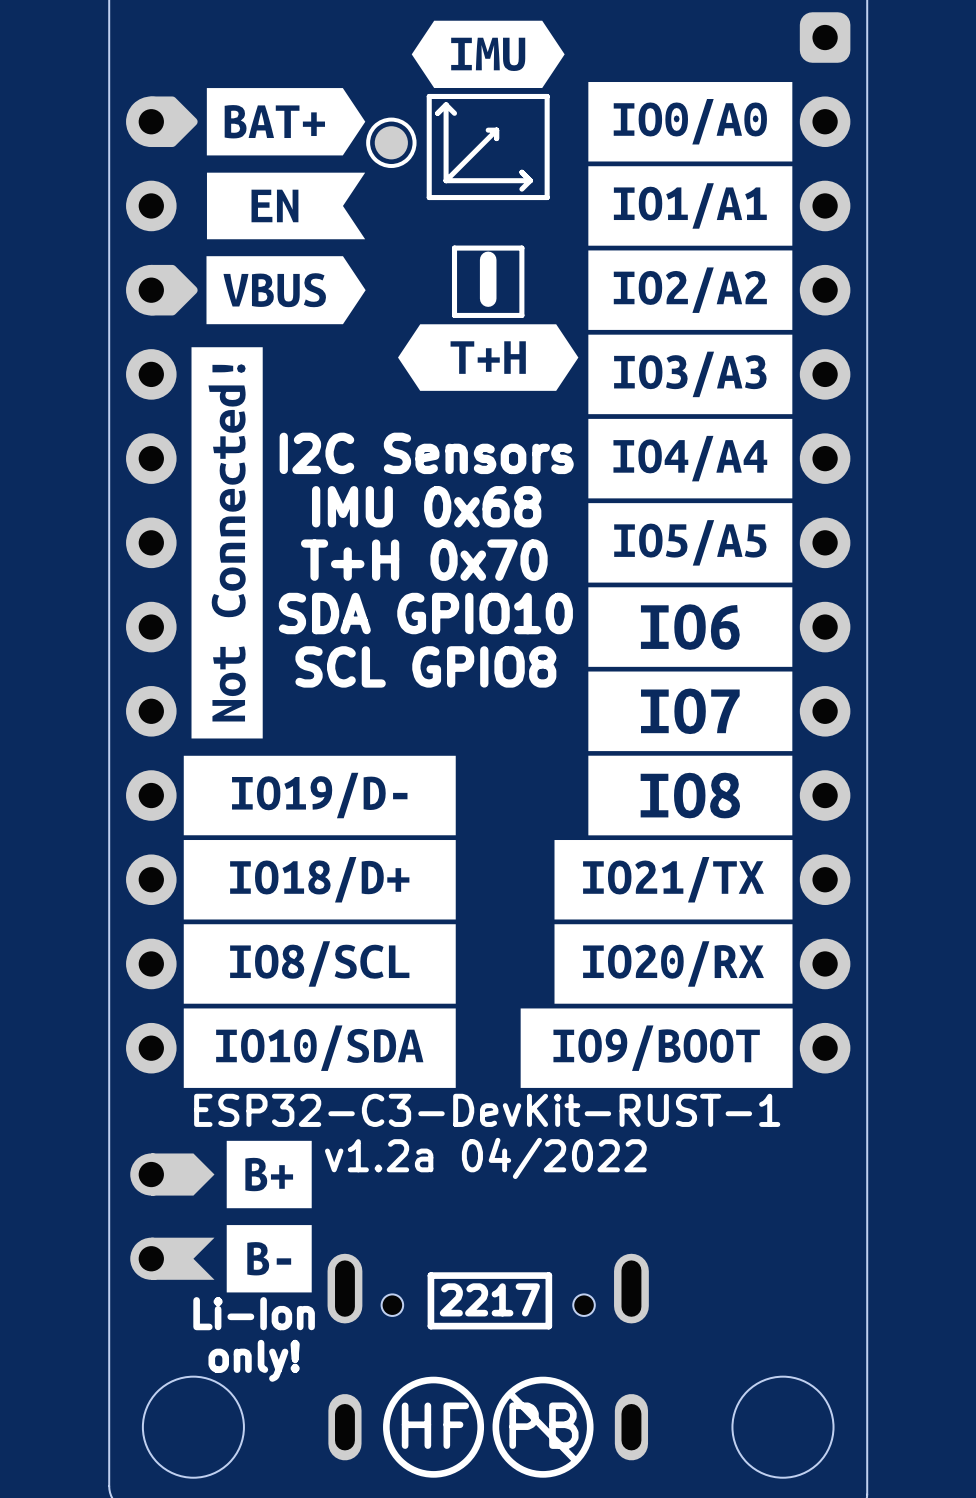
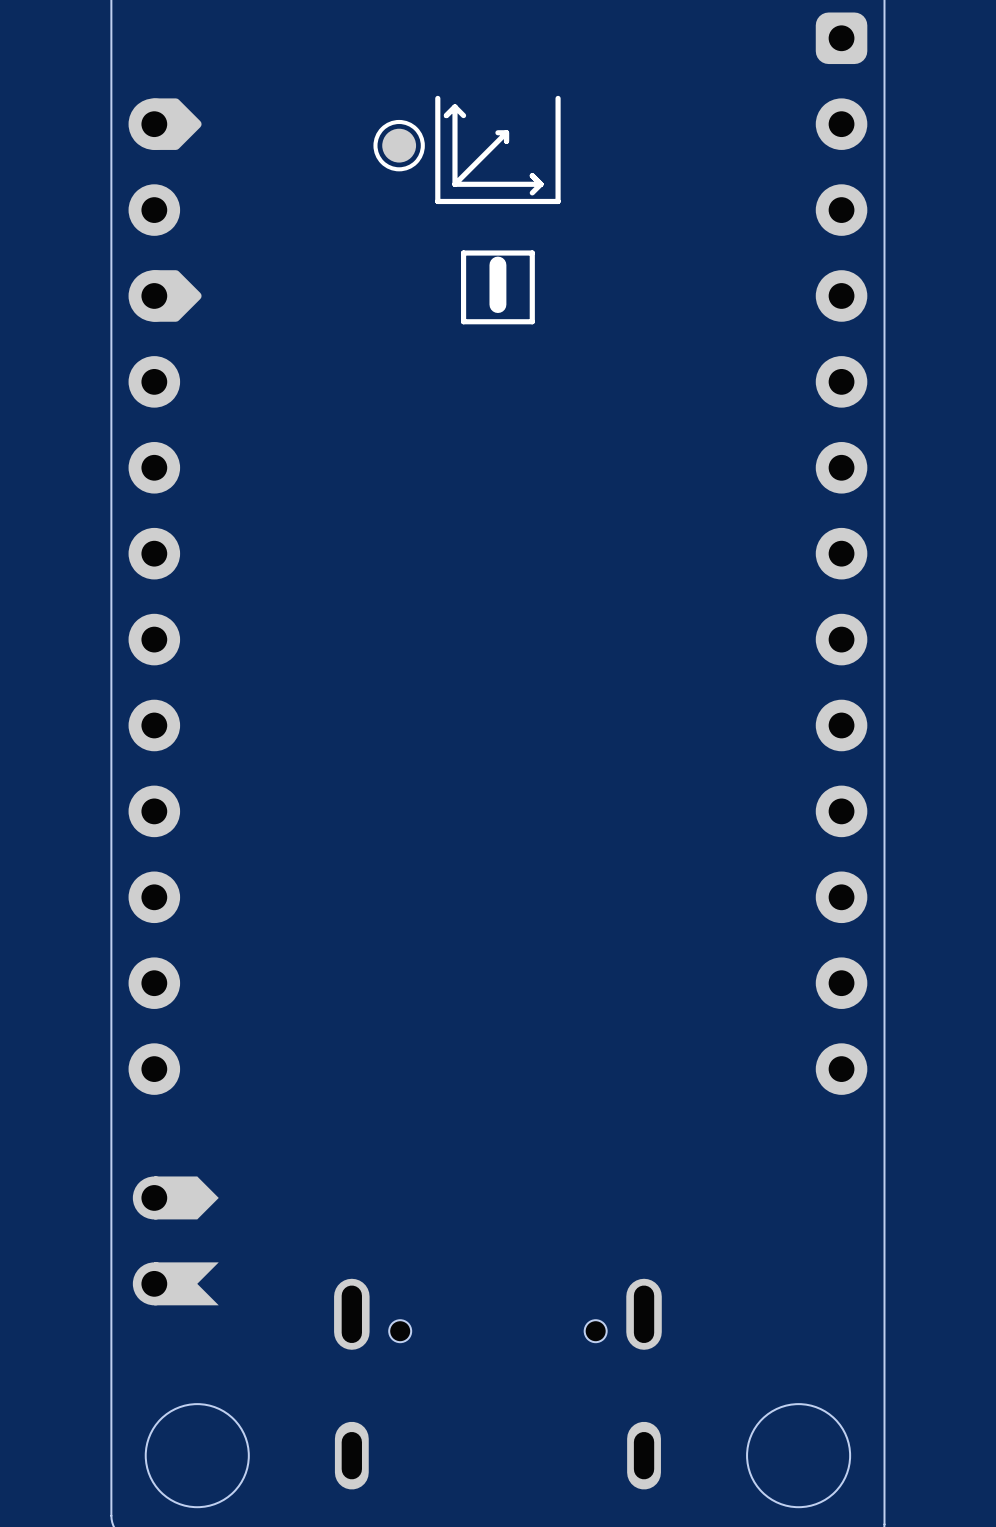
drawing: [183, 20, 793, 1088] -> none
line: (547, 96) (429, 96) -> none
text: I2C Sensors (426, 453) -> none
text: IMU 0x68 (426, 506) -> none
text: T+H 0x70 (424, 560) -> none
text: SDA GPIO10 (425, 613) -> none
text: SCL GPIO8 (425, 666) -> none
text: ESP32-C3-DevKit-RUST-1 (487, 1110) -> none
drawing: [226, 1140, 312, 1293] -> none
text: v1.2a 04/2022 (485, 1158) -> none
line: (548, 1275) (430, 1275) (430, 1326) (548, 1326) (548, 1275) -> none
text: 2217 (489, 1299) -> none
text: Li-Ion (254, 1313) -> none
text: only! (254, 1360) -> none
drawing: [383, 1376, 594, 1478] -> none

